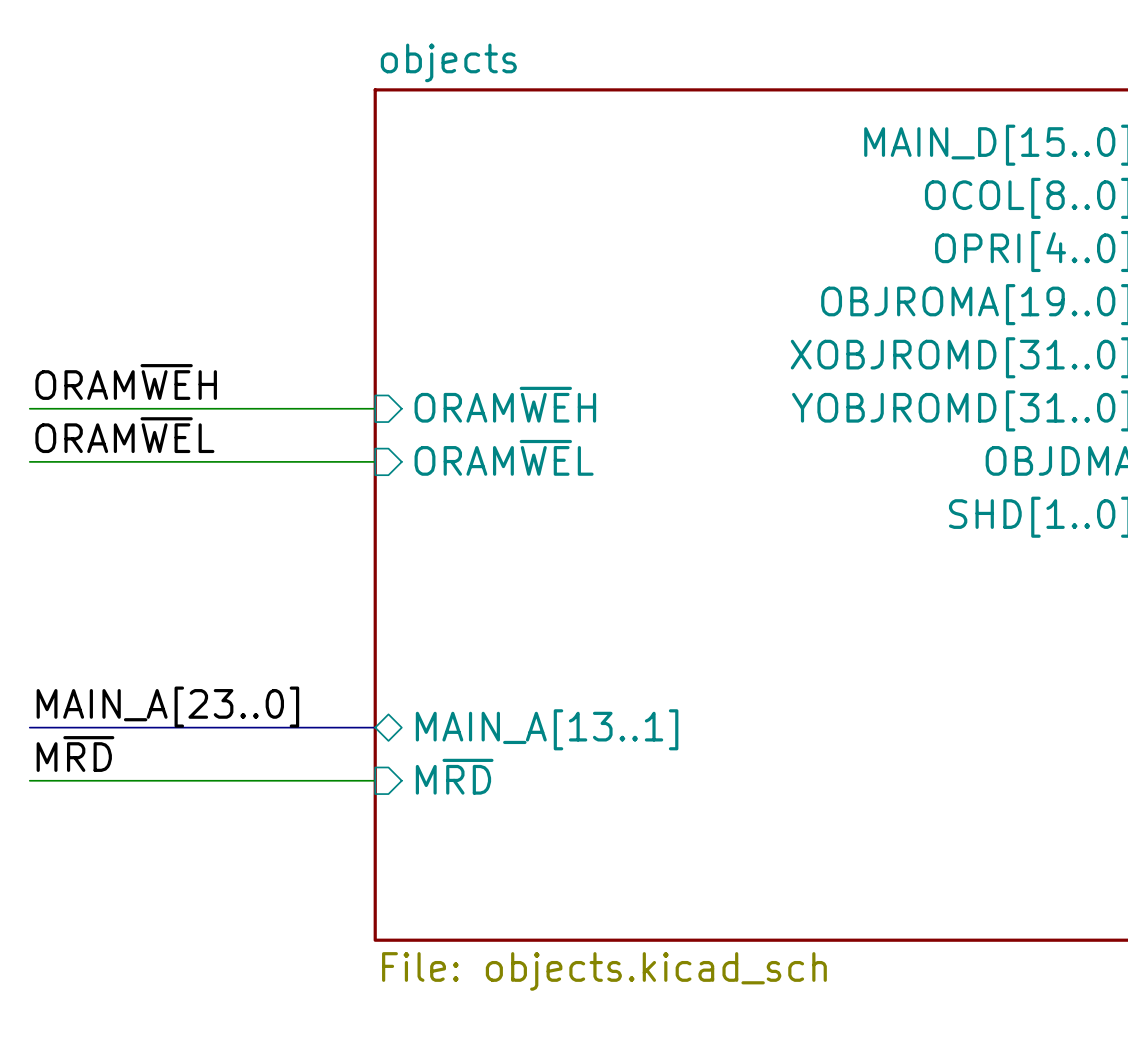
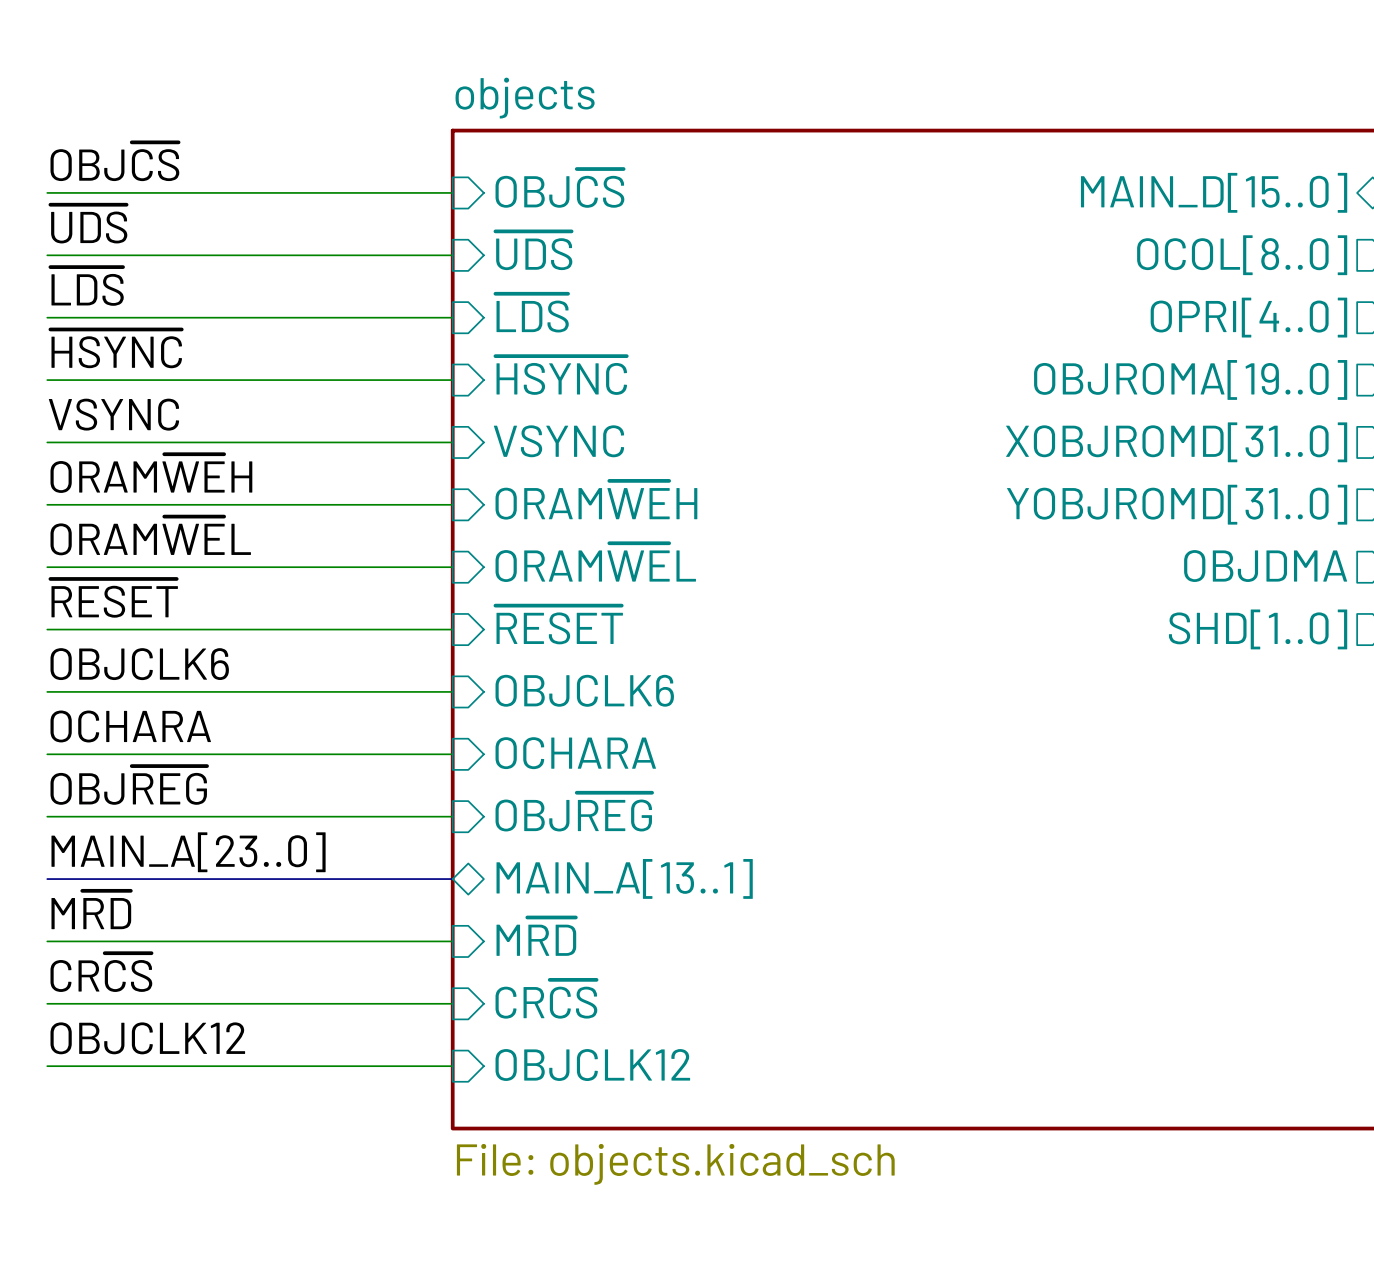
label: none -> OBJ~{CS} (114, 161)
sheet pin: none -> OBJ~{CS} (559, 188)
wire: none -> (47, 192) (452, 192)
label: none -> ~{UDS} (88, 224)
sheet pin: none -> ~{UDS} (533, 250)
wire: none -> (47, 255) (452, 255)
label: none -> ~{LDS} (87, 286)
sheet pin: none -> ~{LDS} (532, 313)
wire: none -> (47, 317) (452, 317)
label: none -> ~{HSYNC} (116, 348)
sheet pin: none -> ~{HSYNC} (561, 375)
wire: none -> (47, 380) (452, 380)
label: none -> VSYNC (113, 414)
sheet pin: none -> VSYNC (558, 441)
wire: none -> (47, 442) (452, 442)
label: none -> ~{RESET} (114, 598)
sheet pin: none -> ~{RESET} (559, 624)
wire: none -> (47, 629) (452, 629)
label: none -> OBJCLK6 (139, 664)
sheet pin: none -> OBJCLK6 (584, 690)
wire: none -> (47, 691) (452, 691)
label: none -> OCHARA (130, 726)
sheet pin: none -> OCHARA (575, 753)
wire: none -> (47, 754) (452, 754)
label: none -> OBJ~{REG} (128, 785)
sheet pin: none -> OBJ~{REG} (573, 812)
wire: none -> (47, 816) (452, 816)
label: none -> CR~{CS} (101, 972)
sheet pin: none -> CR~{CS} (546, 999)
wire: none -> (47, 1003) (452, 1003)
label: none -> OBJCLK12 (147, 1038)
sheet pin: none -> OBJCLK12 (592, 1065)
wire: none -> (47, 1066) (452, 1066)

